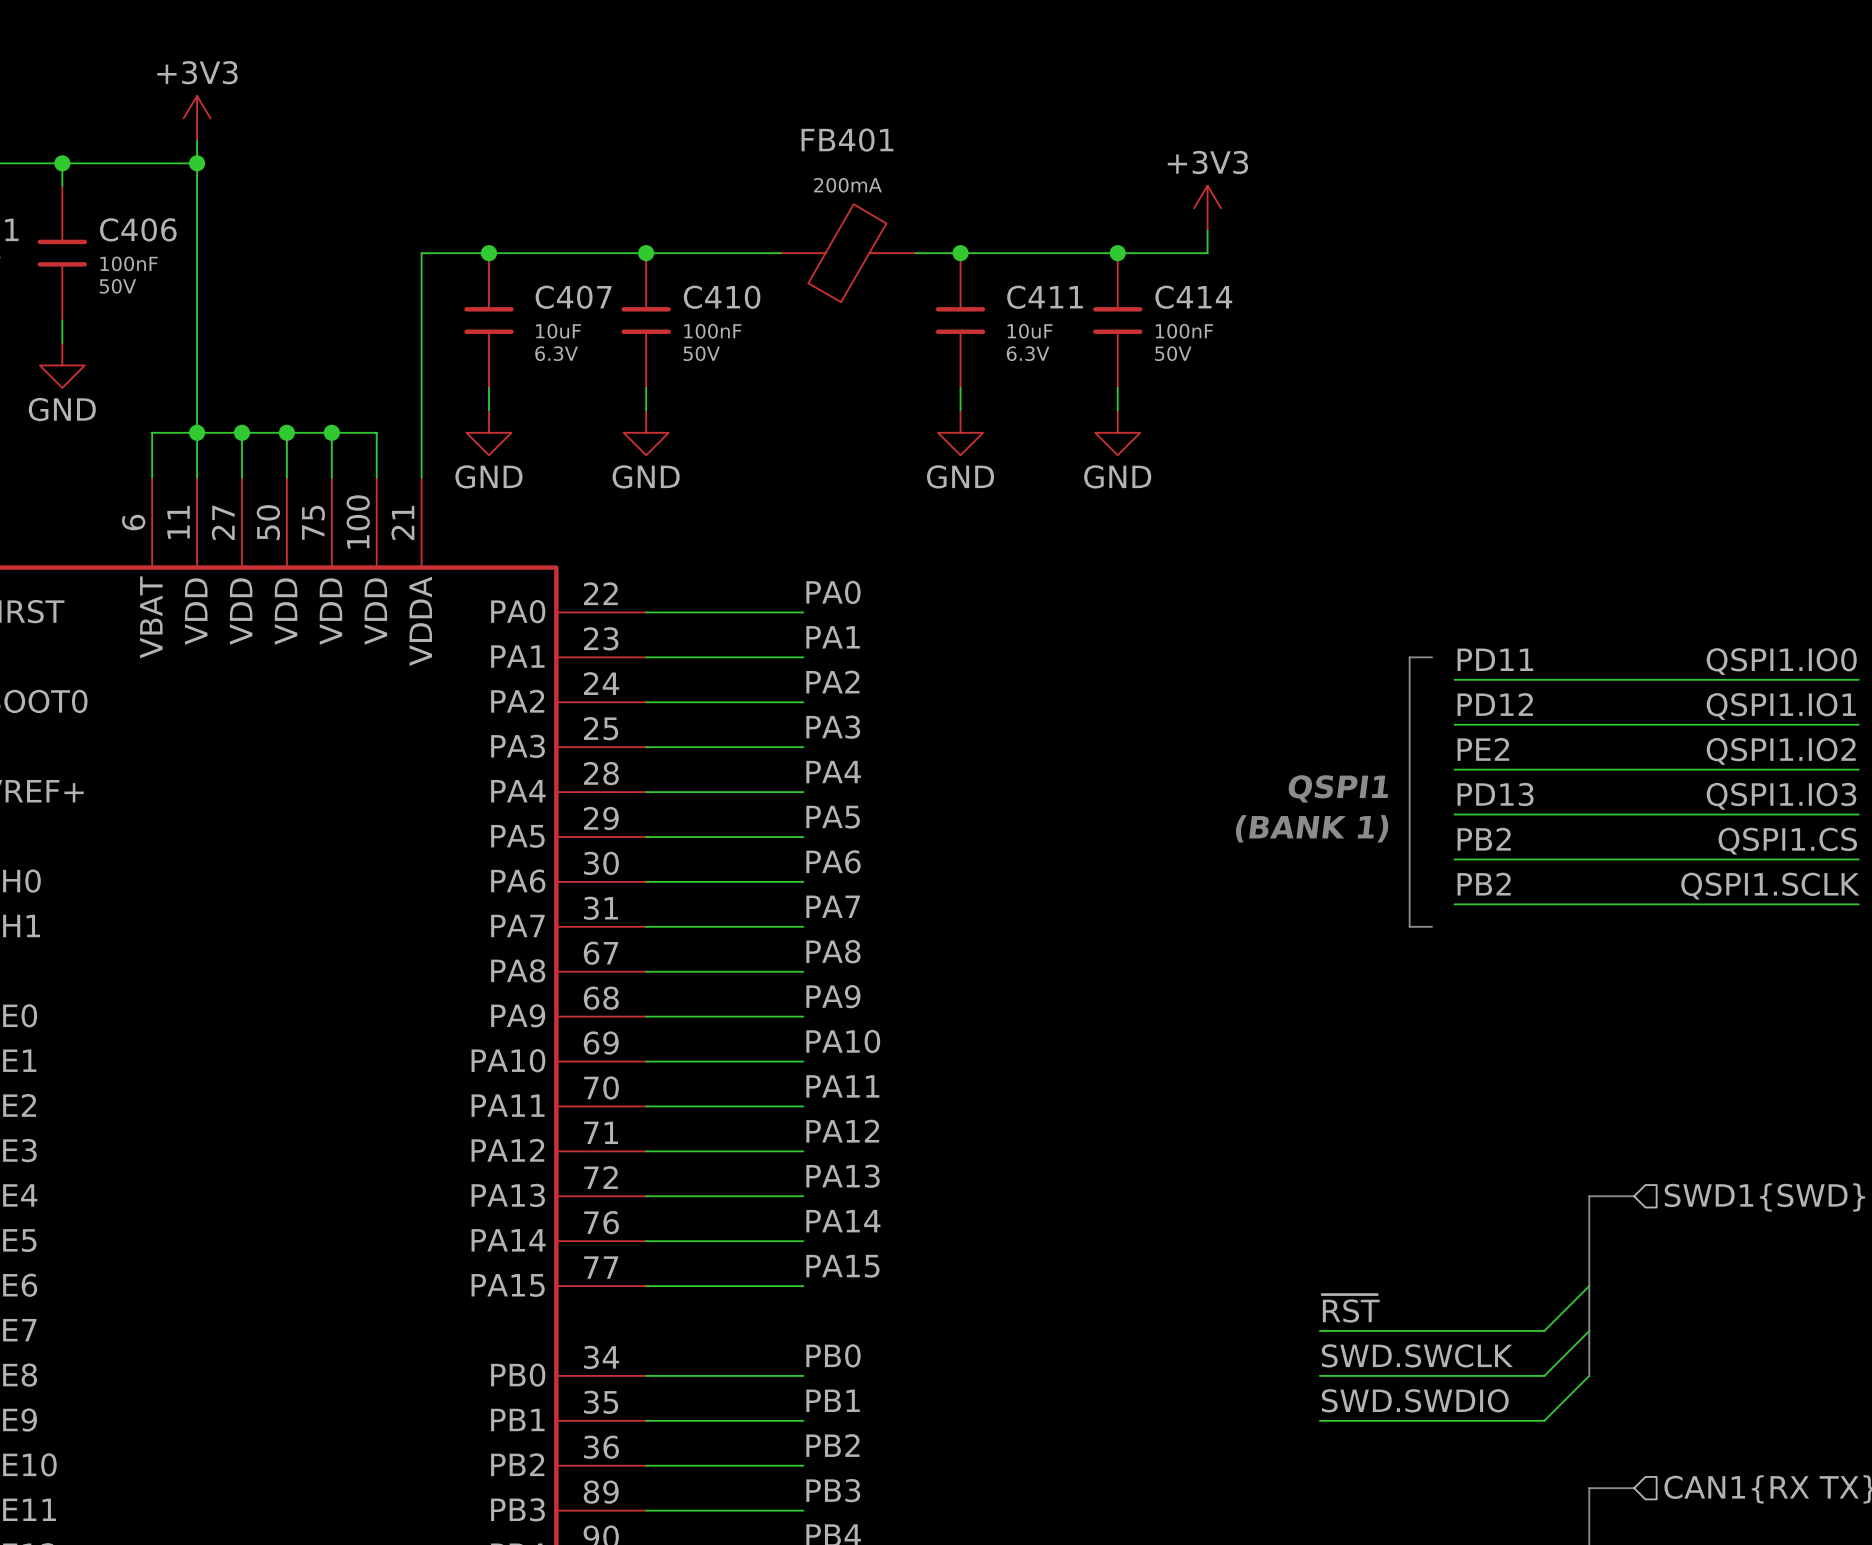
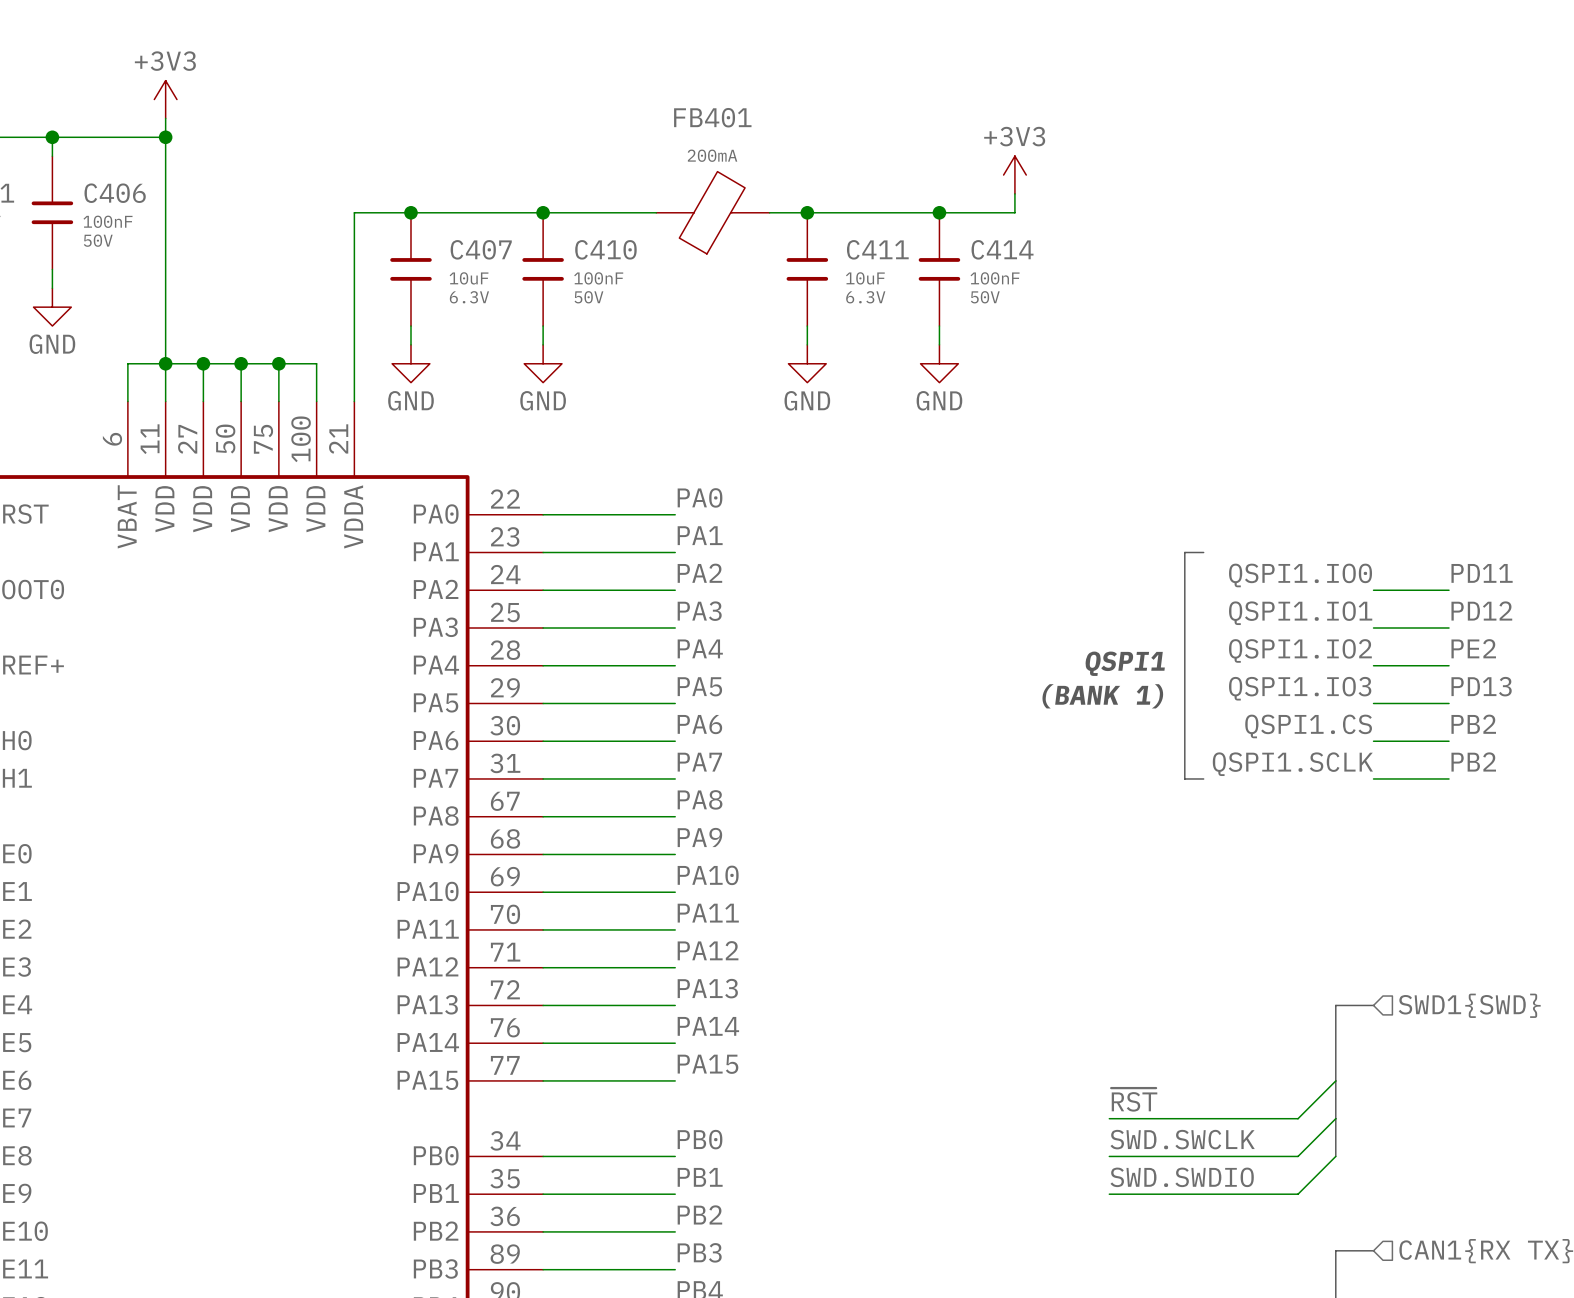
label position: PD11 (1495, 659) -> PD11 (1482, 573)
label position: QSPI1.IO0 (1781, 661) -> QSPI1.IO0 (1300, 575)
wire: (1454, 679) (1858, 679) -> none
wire: none -> (1373, 590) (1449, 590)
label position: PD12 (1495, 704) -> PD12 (1481, 610)
label position: QSPI1.IO1 (1781, 706) -> QSPI1.IO1 (1300, 613)
wire: (1454, 724) (1858, 724) -> none
wire: none -> (1373, 628) (1449, 628)
label position: PE2 (1483, 749) -> PE2 (1473, 648)
label position: QSPI1.IO2 (1781, 751) -> QSPI1.IO2 (1300, 650)
wire: (1454, 769) (1858, 769) -> none
wire: none -> (1373, 665) (1449, 665)
label position: PD13 (1495, 794) -> PD13 (1481, 686)
label position: QSPI1.IO3 (1781, 796) -> QSPI1.IO3 (1300, 688)
wire: (1454, 814) (1858, 814) -> none
wire: none -> (1373, 703) (1449, 703)
label: PB2 (1484, 839) -> none
label position: QSPI1.CS (1787, 841) -> QSPI1.CS (1308, 726)
wire: (1454, 859) (1858, 859) -> none
label: none -> PB2 (1473, 724)
wire: none -> (1373, 741) (1449, 741)
label: PB2 (1484, 884) -> none
label position: QSPI1.SCLK (1770, 886) -> QSPI1.SCLK (1292, 764)
wire: (1454, 904) (1858, 904) -> none
label: none -> PB2 (1473, 761)
wire: none -> (1373, 778) (1449, 778)

